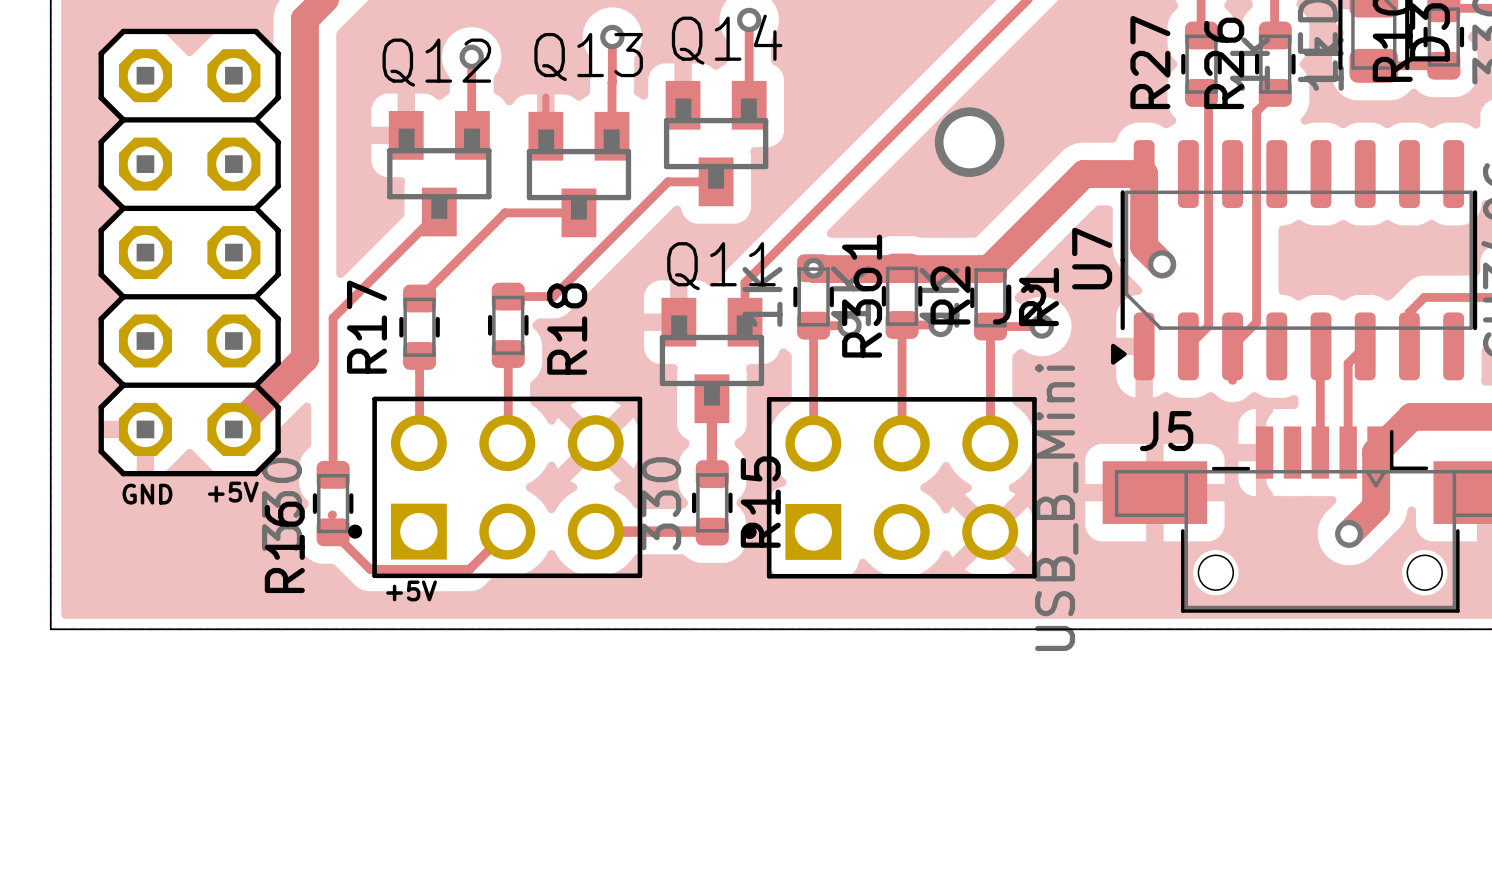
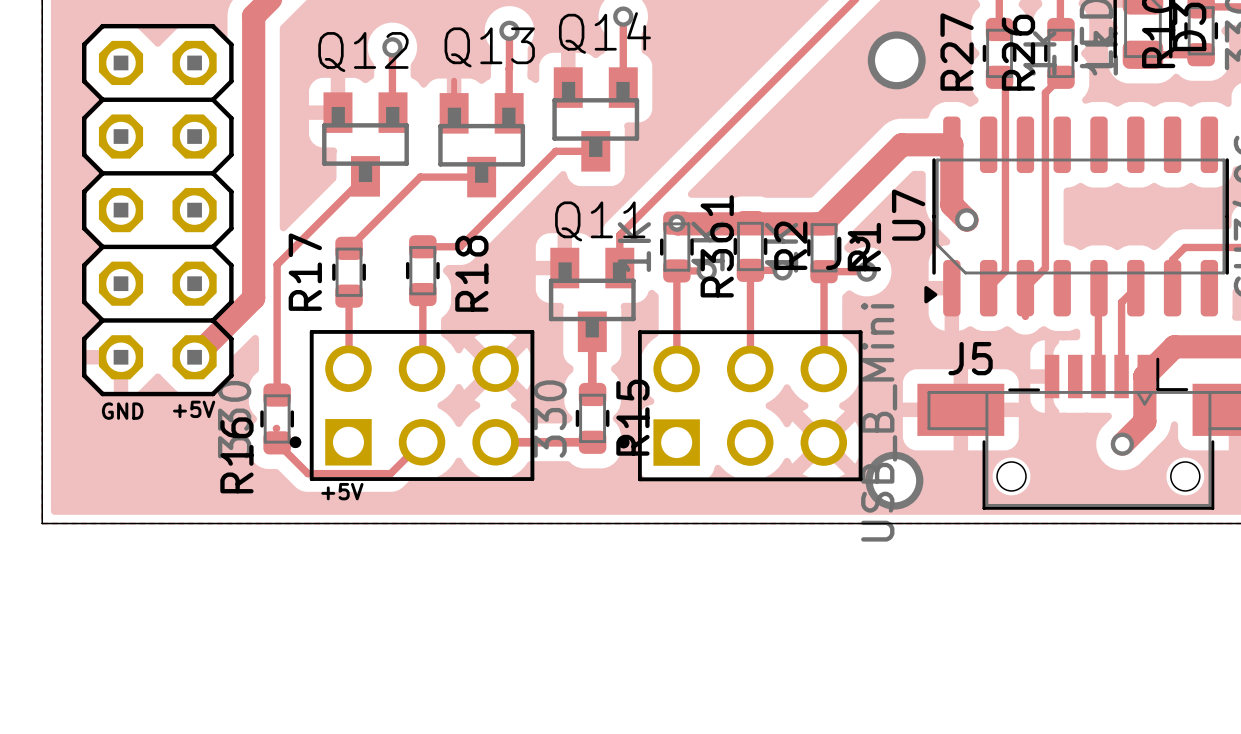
via: none -> (896, 60)
via: (969, 142) -> none
via: none -> (894, 480)

